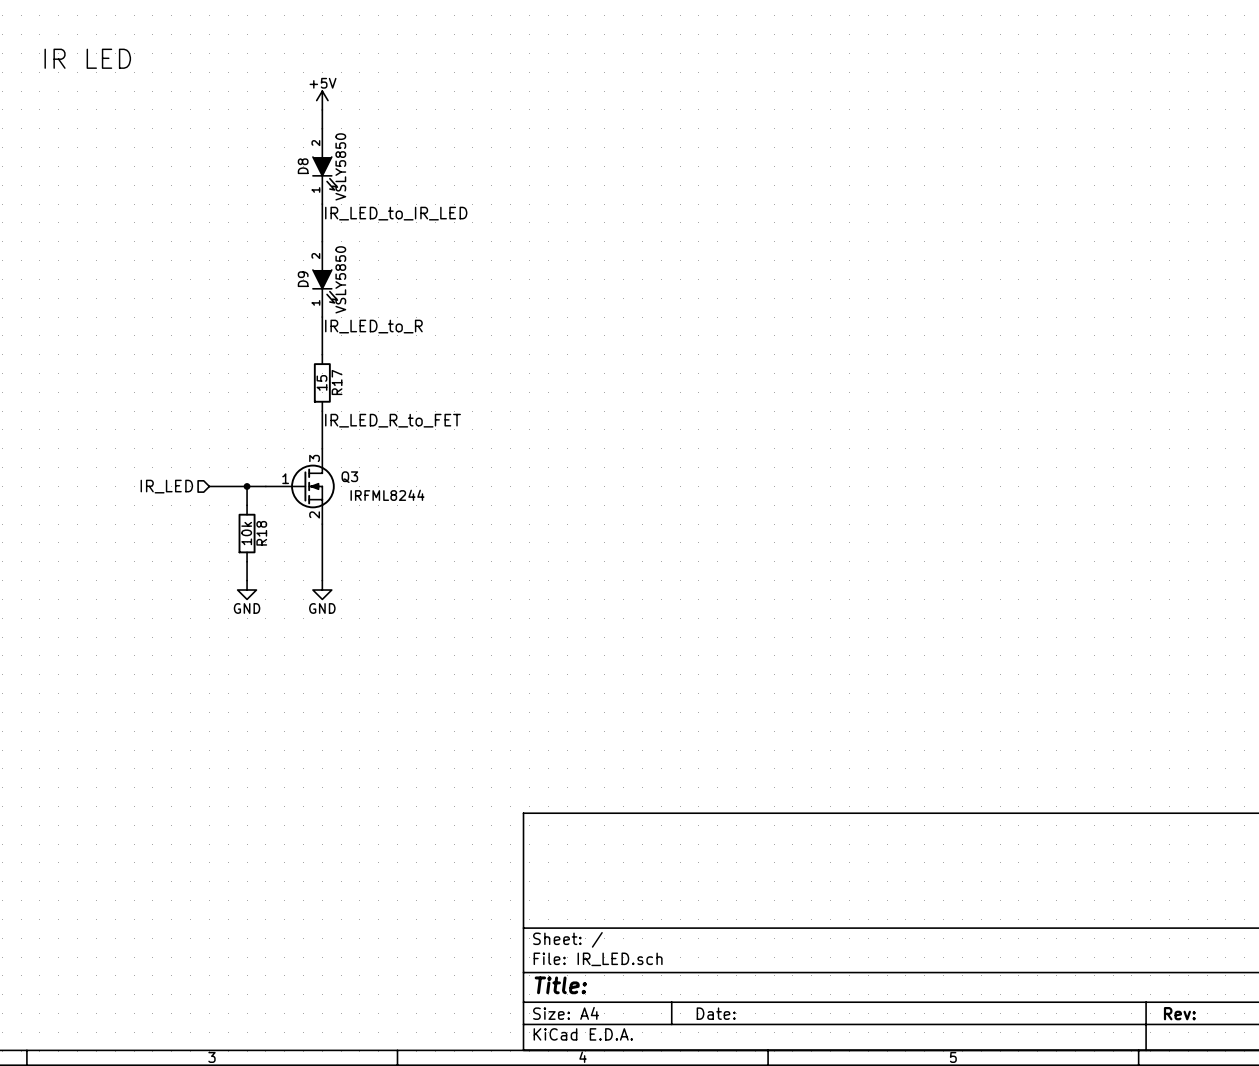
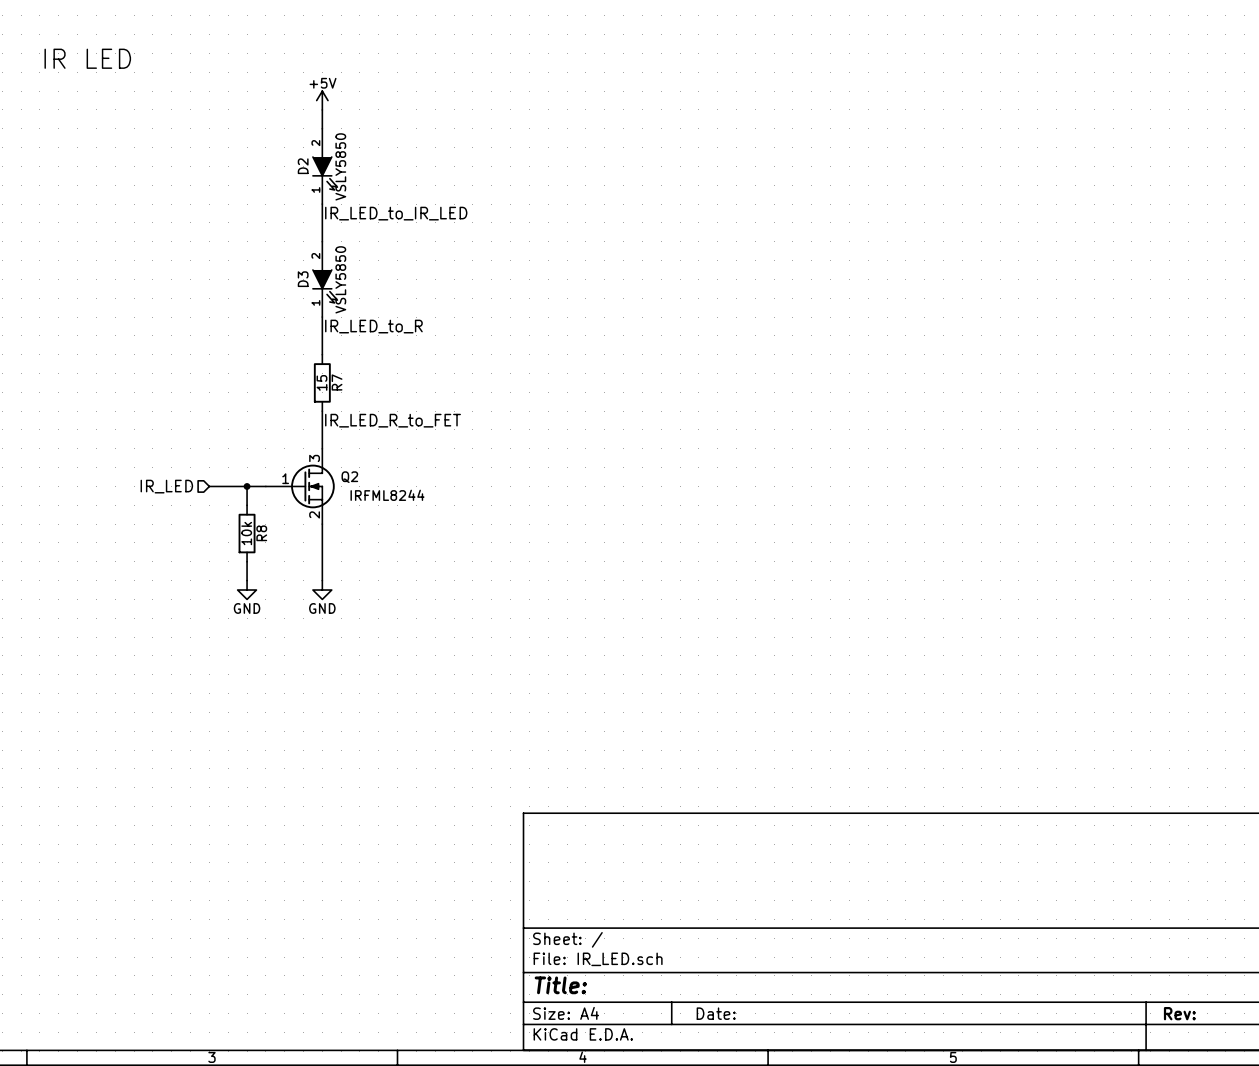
D8 name: D8 (303, 166) -> D2 (303, 166)
D9 name: D9 (303, 279) -> D3 (303, 279)
R17 name: R17 (337, 382) -> R7 (337, 382)
Q3 name: Q3 (349, 477) -> Q2 (349, 477)
R18 name: R18 (261, 533) -> R8 (261, 533)

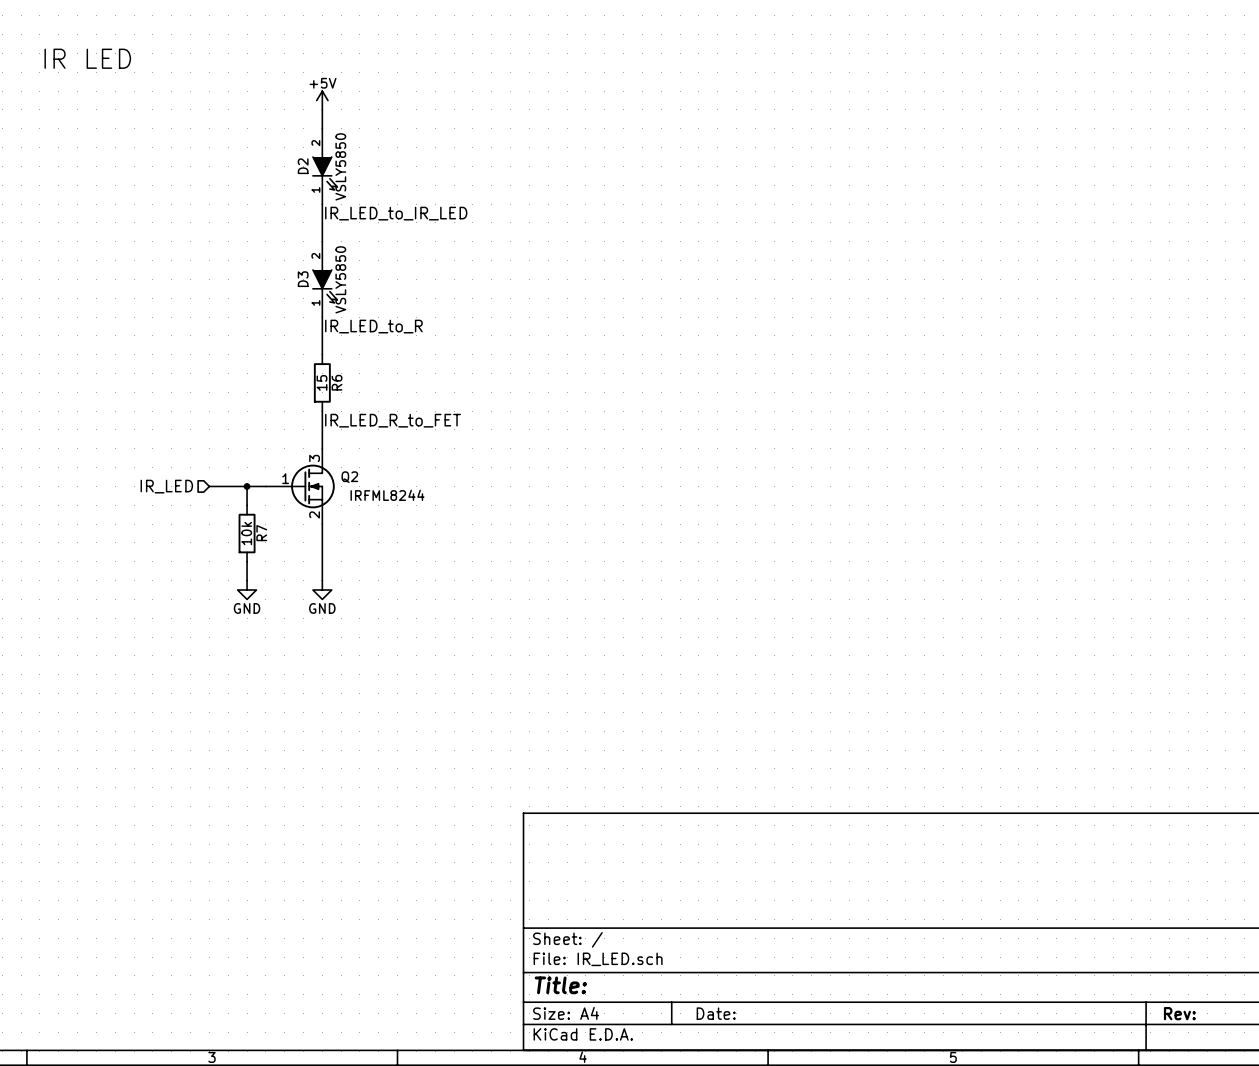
R7 name: R7 (337, 382) -> R6 (337, 382)
R8 name: R8 (261, 533) -> R7 (261, 533)

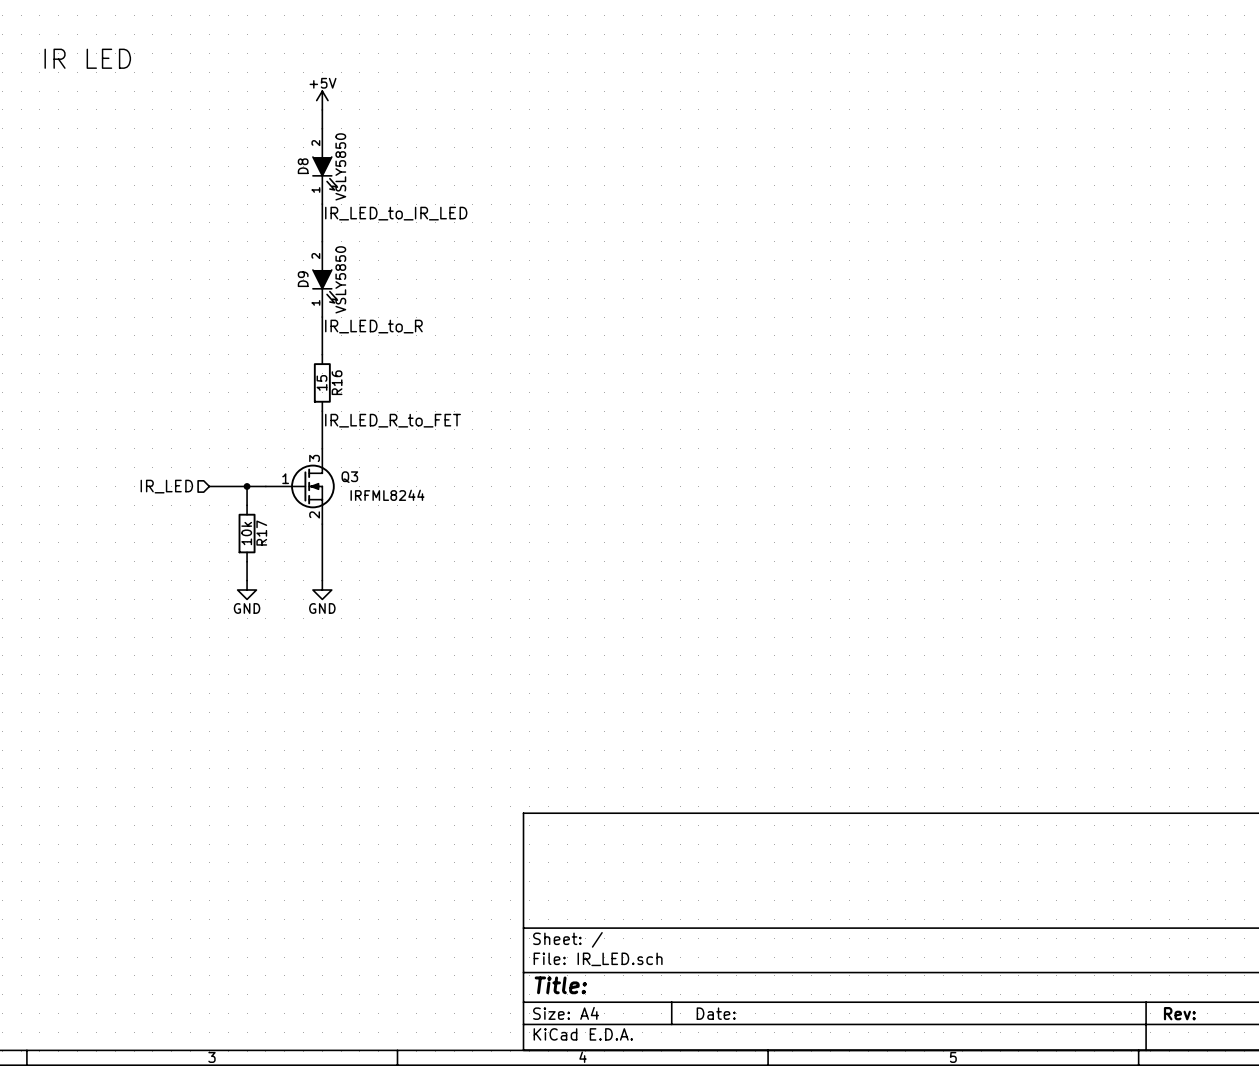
D2 name: D2 (303, 166) -> D8 (303, 166)
D3 name: D3 (303, 279) -> D9 (303, 279)
R6 name: R6 (337, 382) -> R16 (337, 382)
Q2 name: Q2 (349, 477) -> Q3 (349, 477)
R7 name: R7 (261, 533) -> R17 (261, 533)

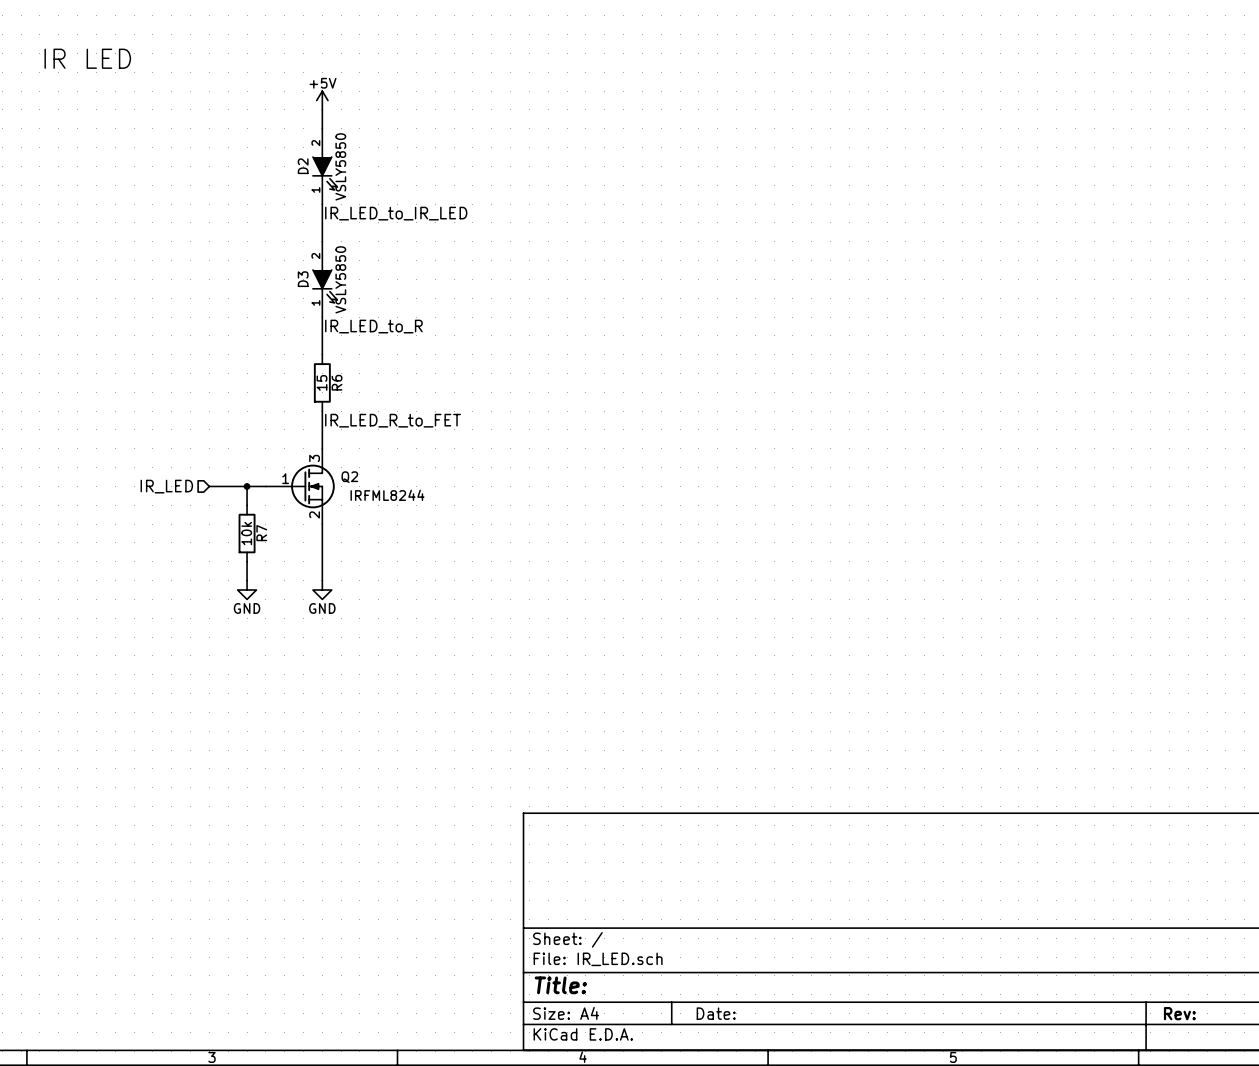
D8 name: D8 (303, 166) -> D2 (303, 166)
D9 name: D9 (303, 279) -> D3 (303, 279)
R16 name: R16 (337, 382) -> R6 (337, 382)
Q3 name: Q3 (349, 477) -> Q2 (349, 477)
R17 name: R17 (261, 533) -> R7 (261, 533)

